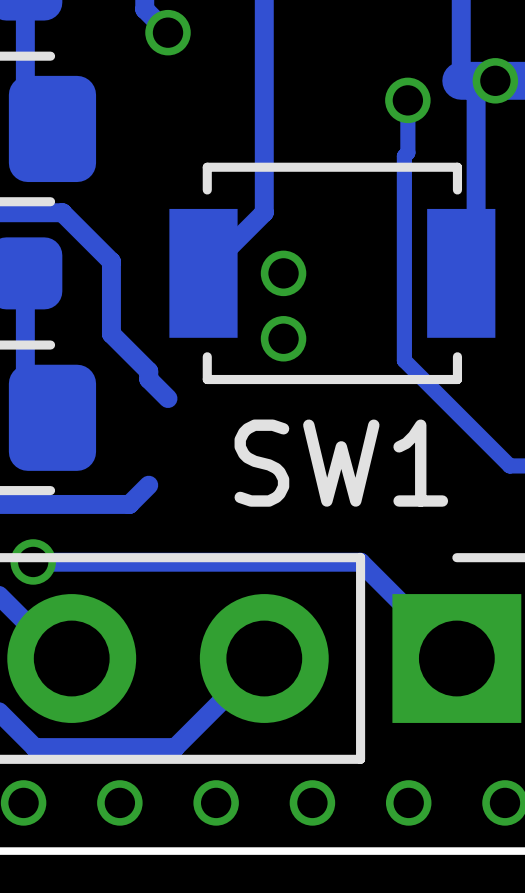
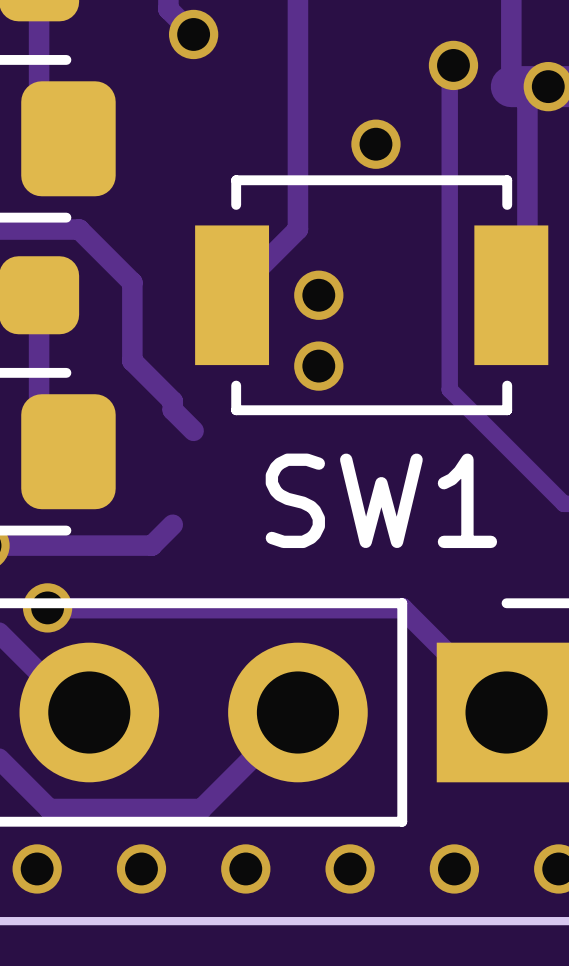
track: (407, 100) (407, 152) (404, 156) -> (453, 65) (449, 69) (449, 168)
via position: (407, 100) -> (453, 65)
via: none -> (375, 144)

